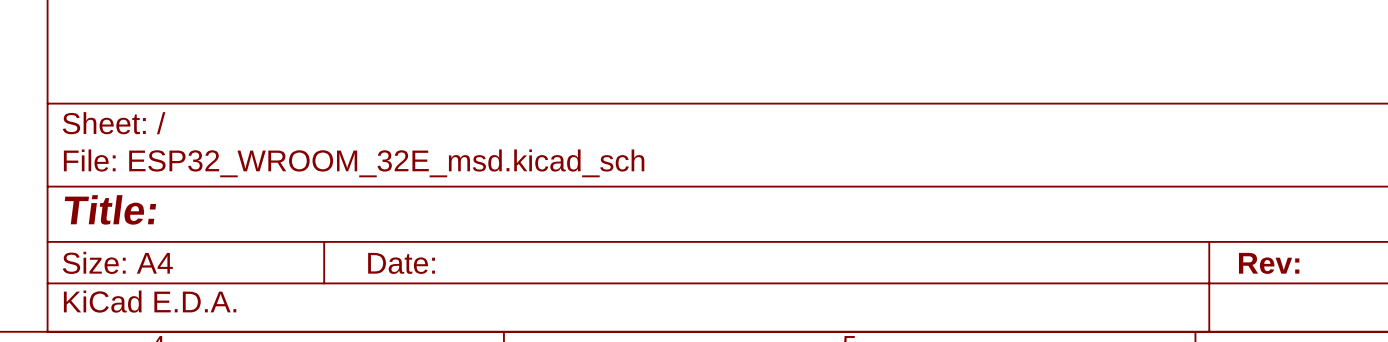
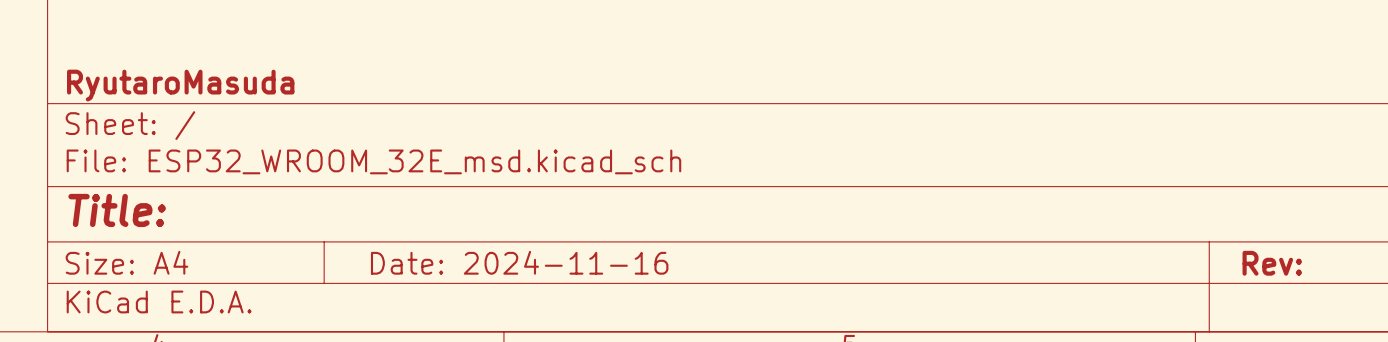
title block: none -> RyutaroMasuda (180, 85)
title block: Date: (401, 263) -> Date: 2024-11-16 (519, 262)

